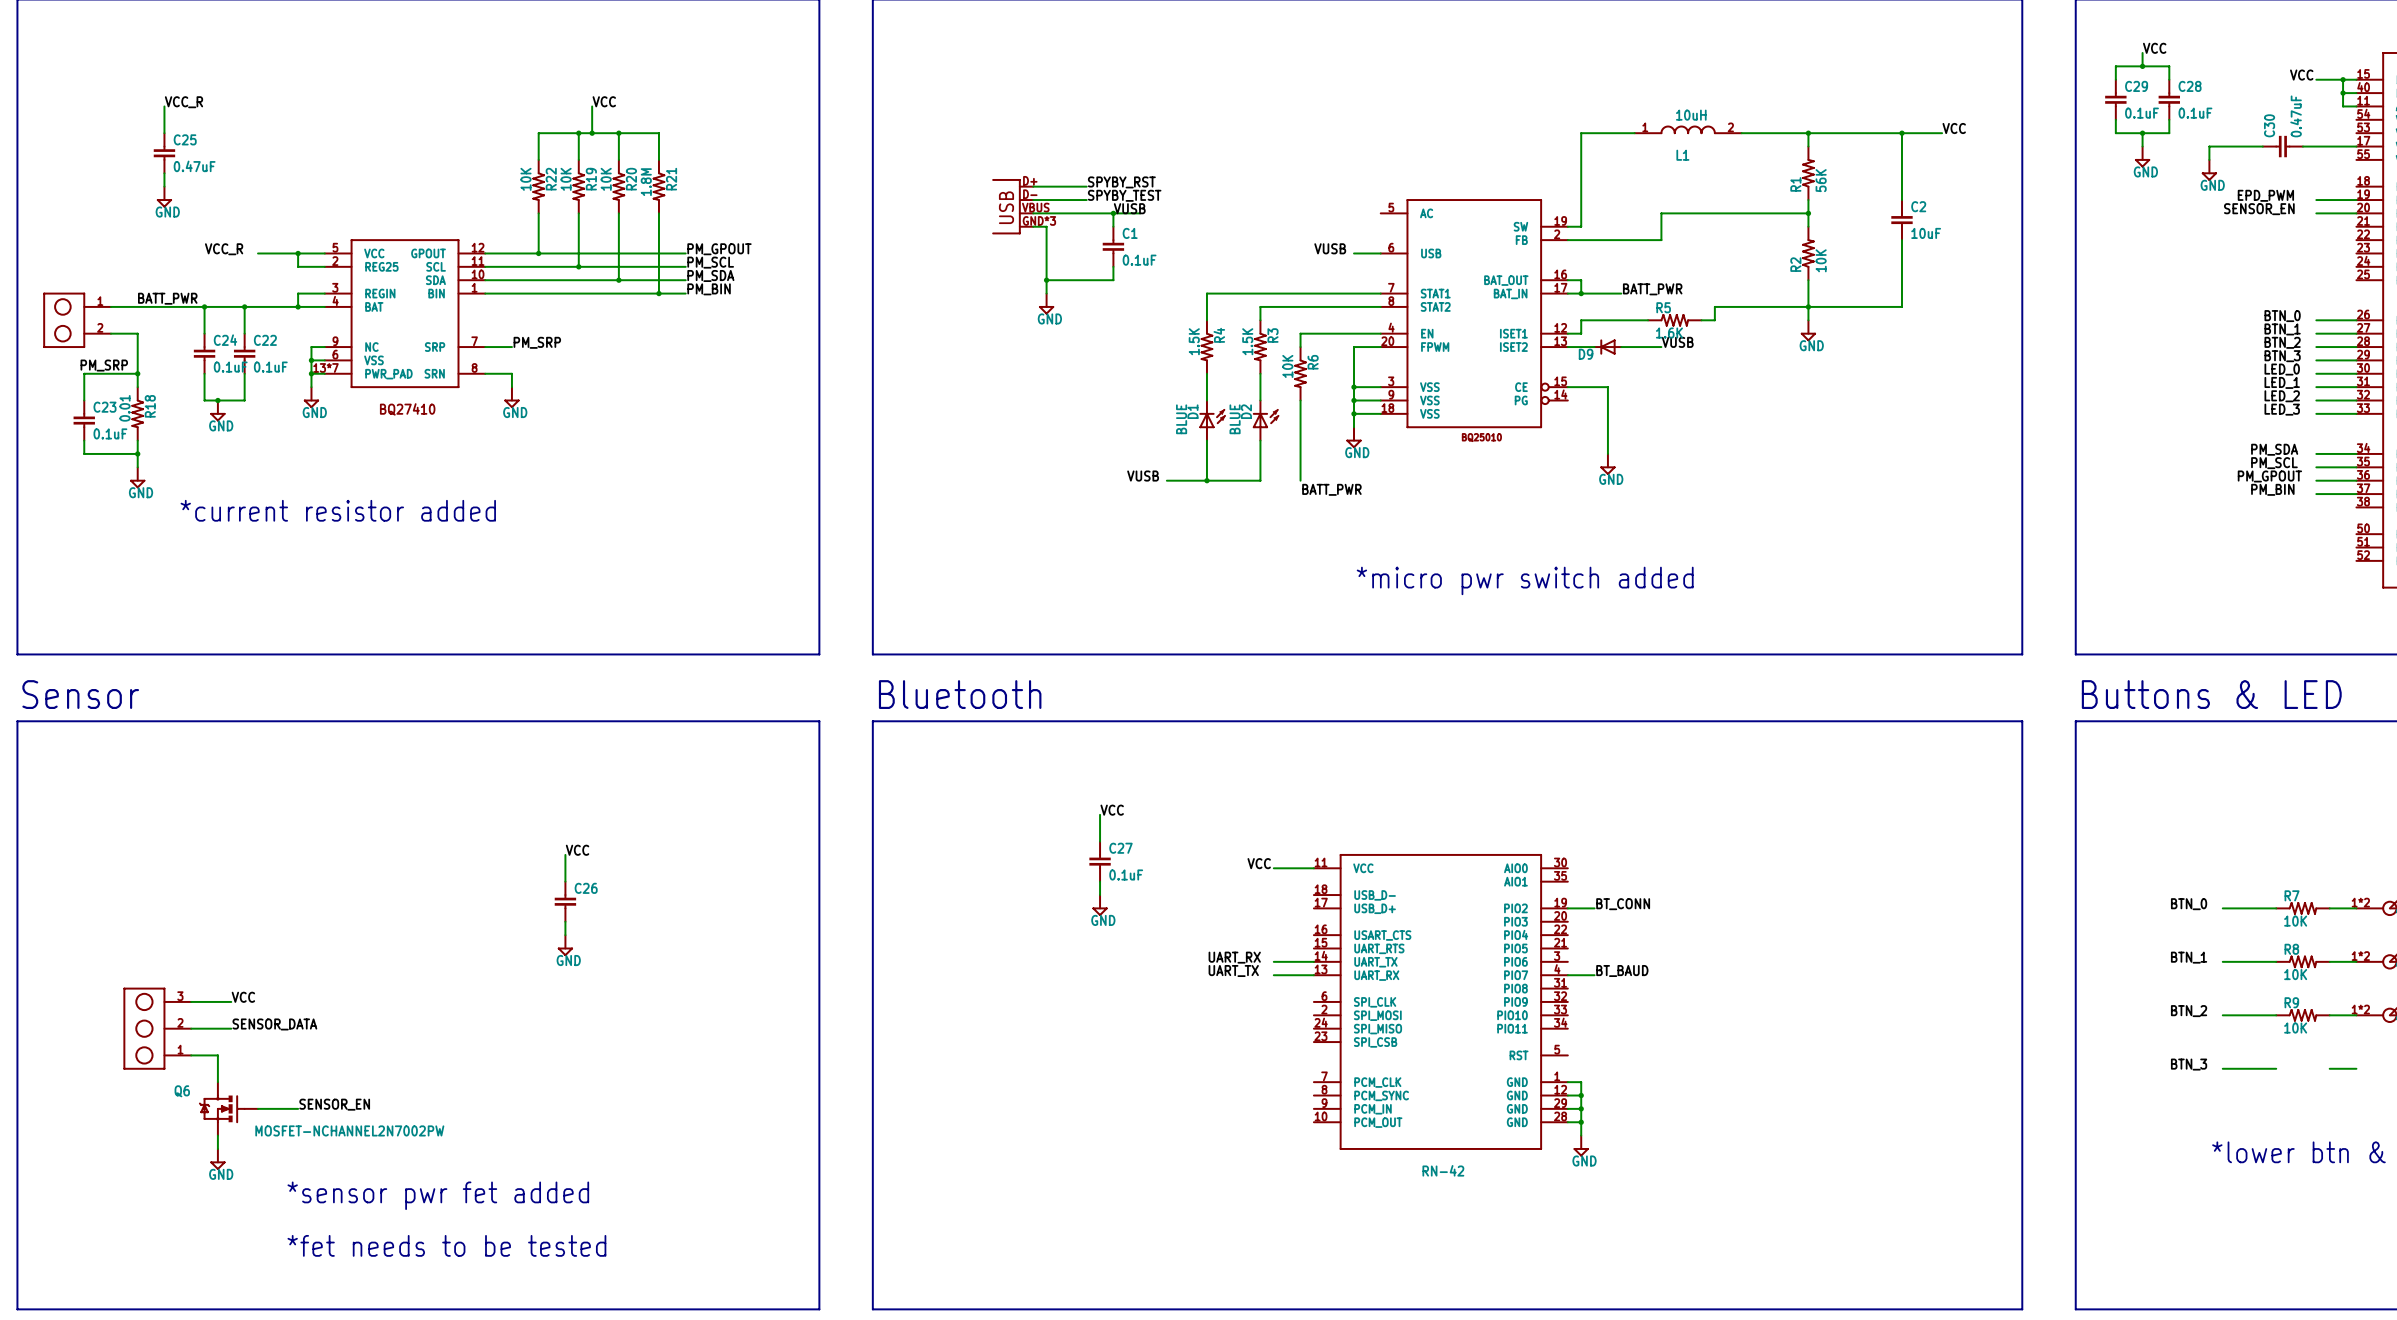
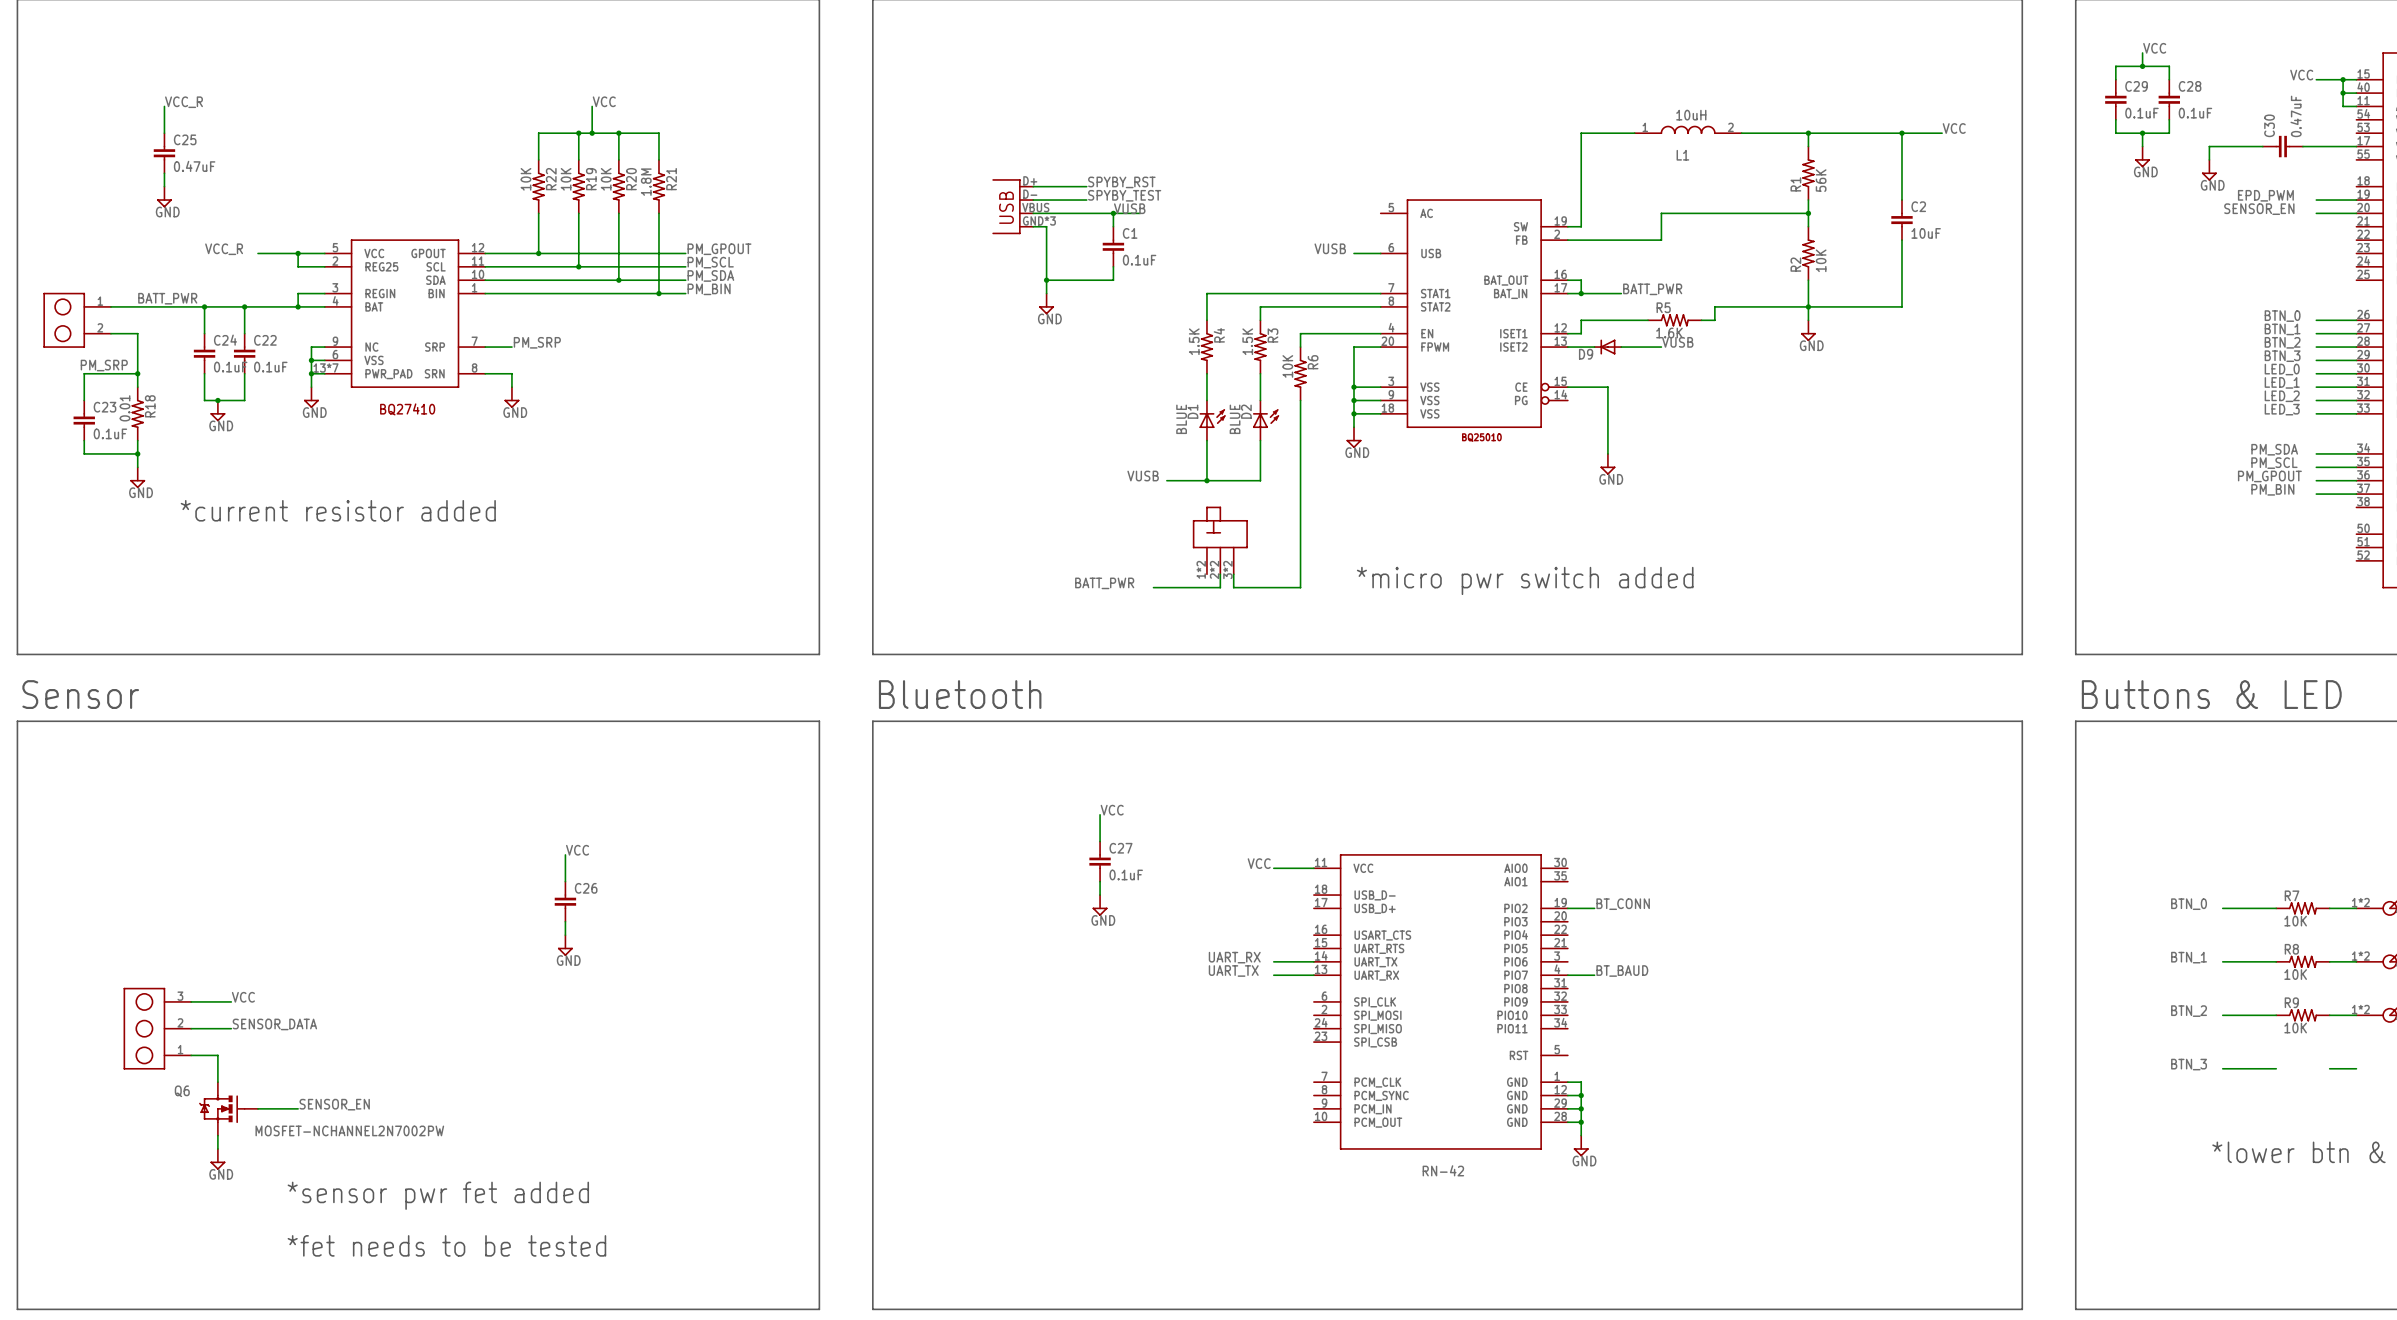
wire: none -> (1300, 480) (1300, 587) (1233, 587) (1233, 574)
label: BATT_PWR (1331, 489) -> none
part: none -> (1220, 540)
wire: none -> (1220, 574) (1220, 587) (1153, 587)
label: none -> BATT_PWR (1104, 583)

